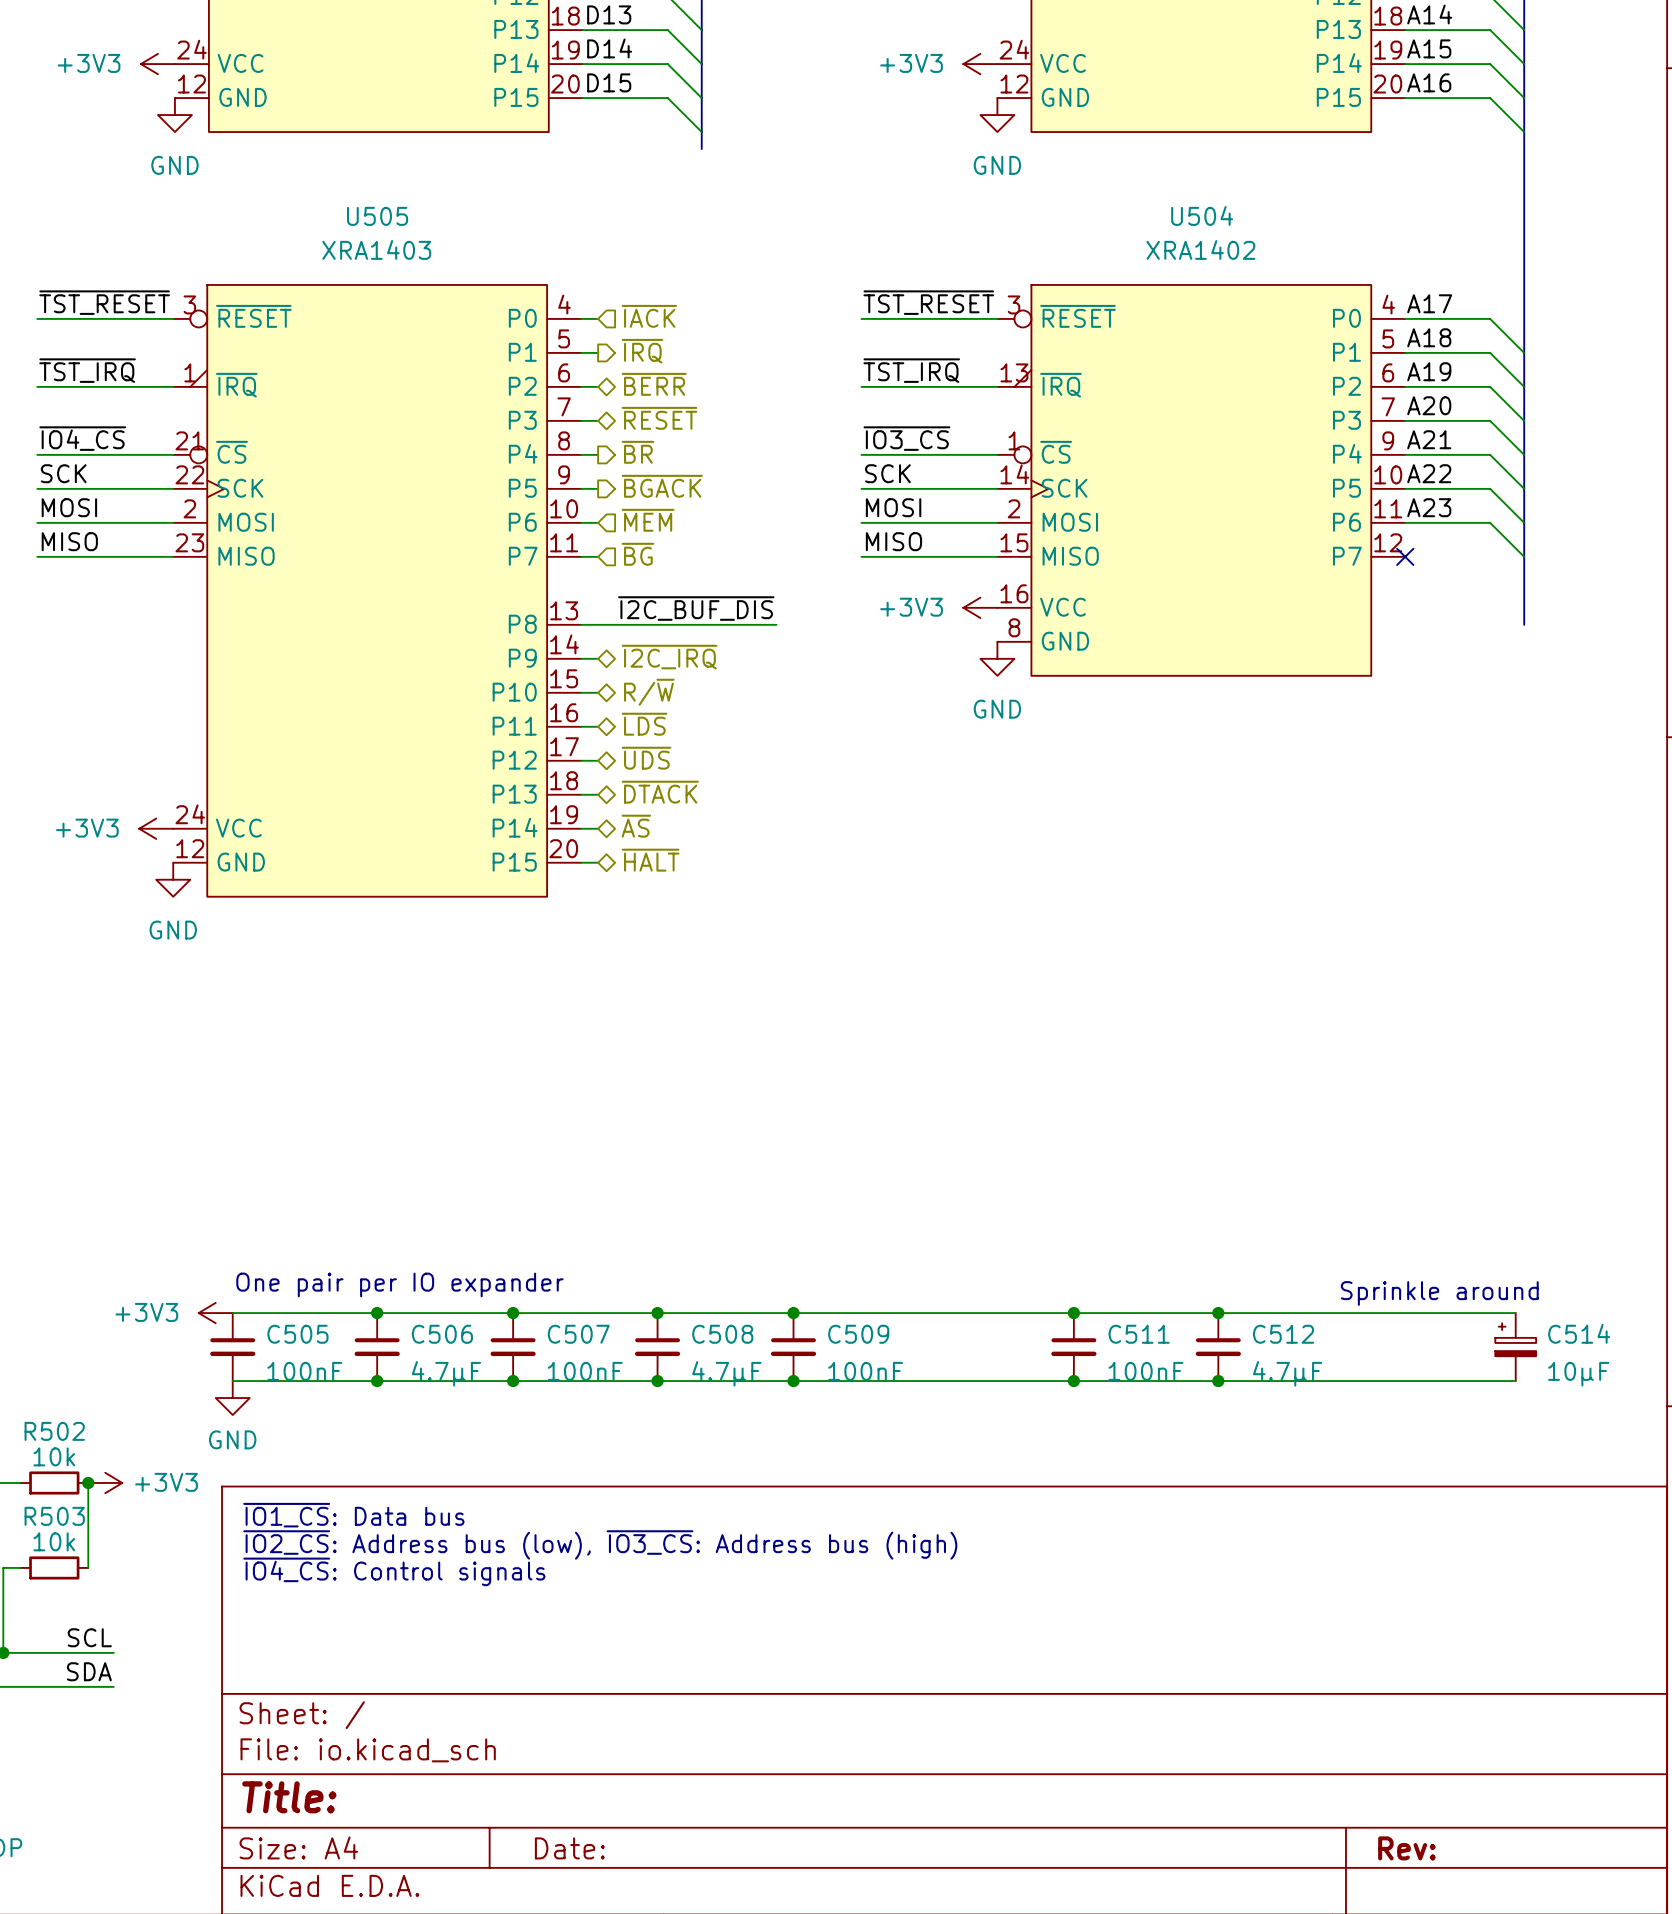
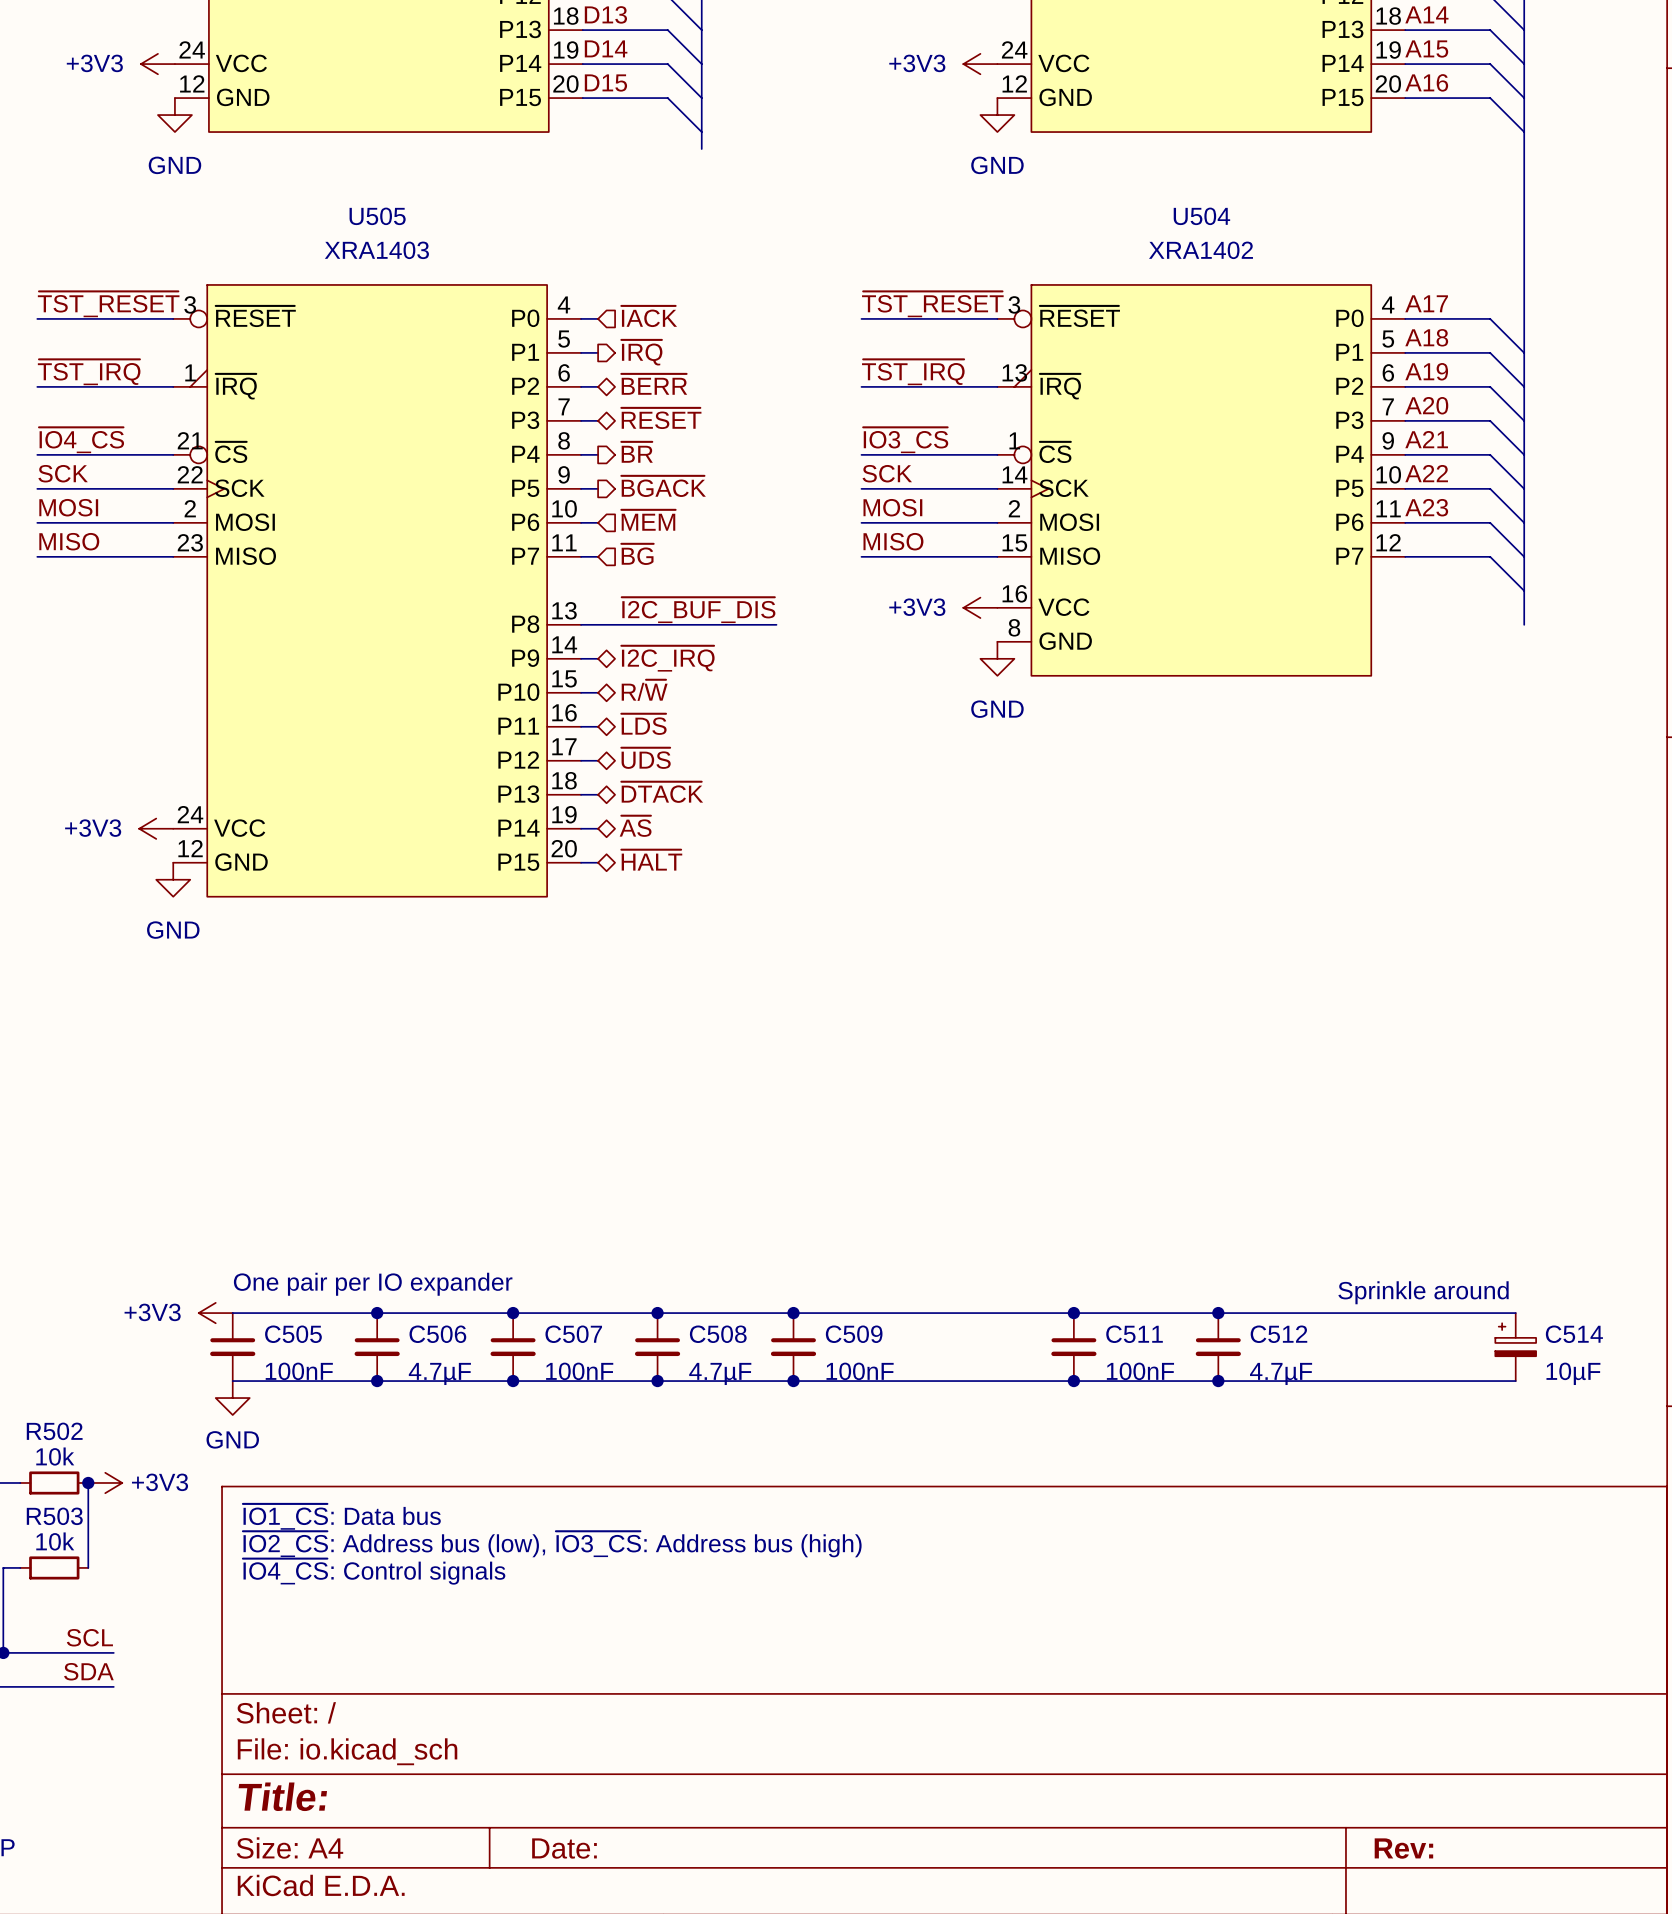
wire: none -> (1405, 556) (1490, 556) (1524, 590)
no-connect mark: (1405, 556) -> none

